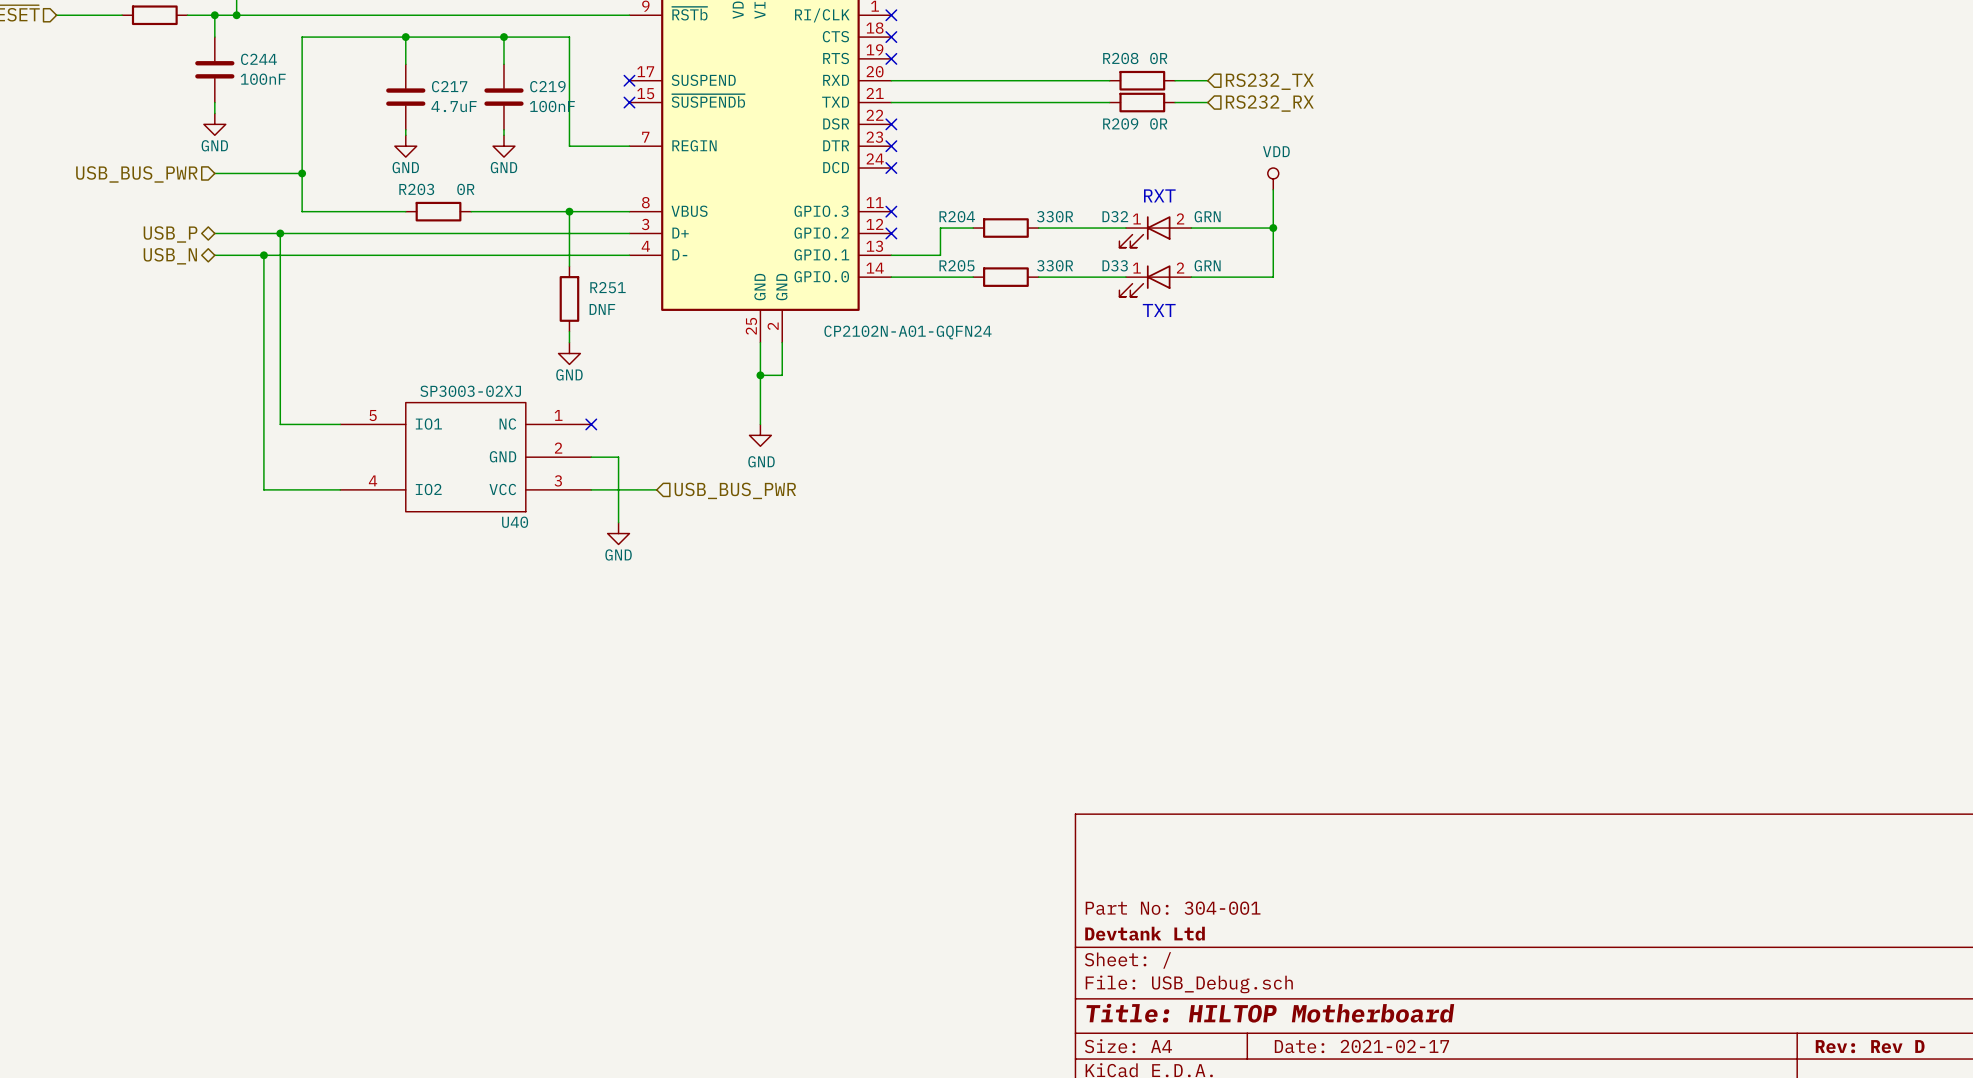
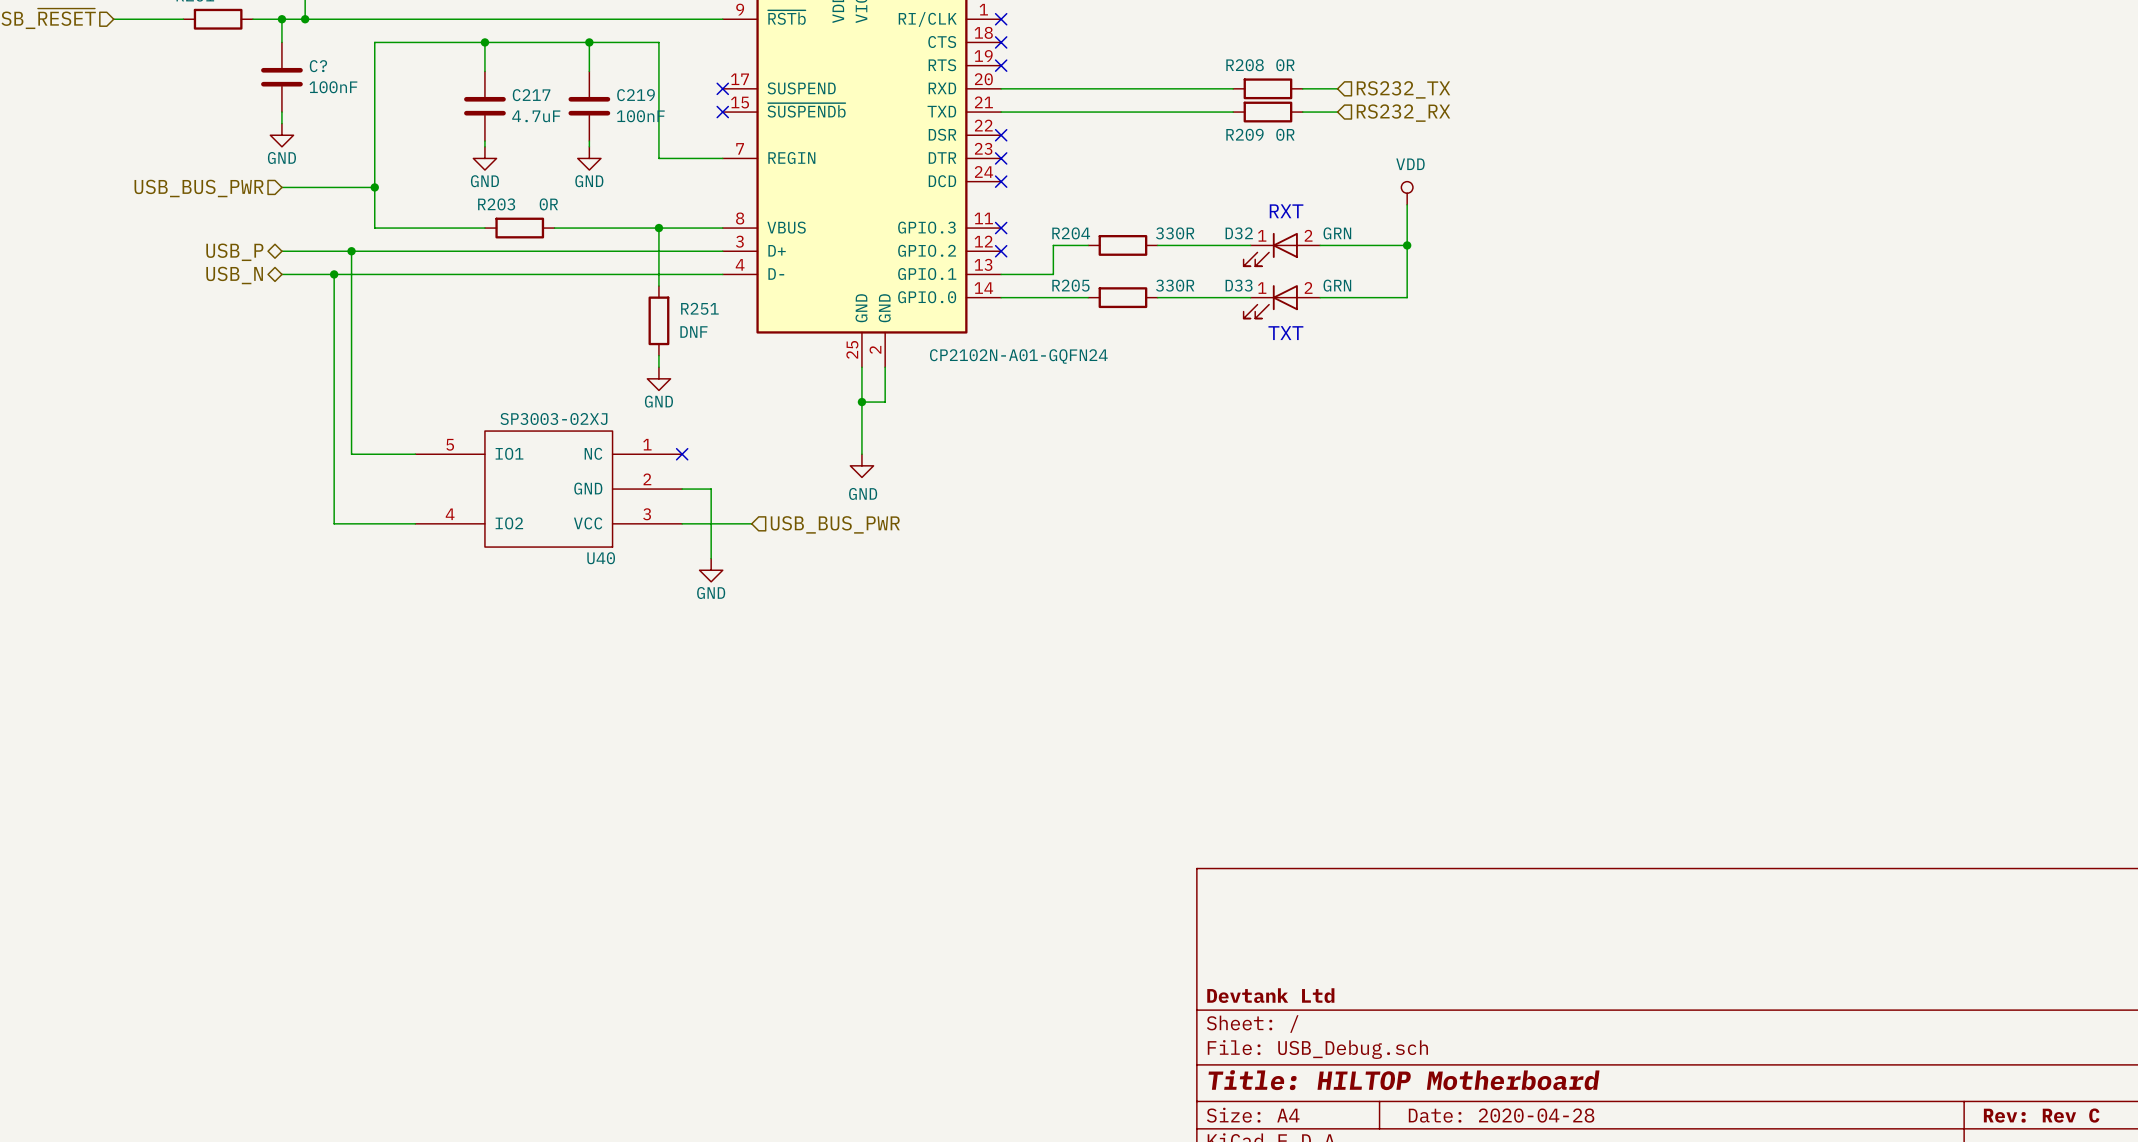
C244 name: C244 (258, 59) -> C? (318, 66)
title block: Part No: 304-001 (1173, 908) -> none
title block: Date: 2021-02-17 (1361, 1046) -> Date: 2020-04-28 (1501, 1115)
title block: Rev: Rev D (1870, 1046) -> Rev: Rev C (2041, 1115)

